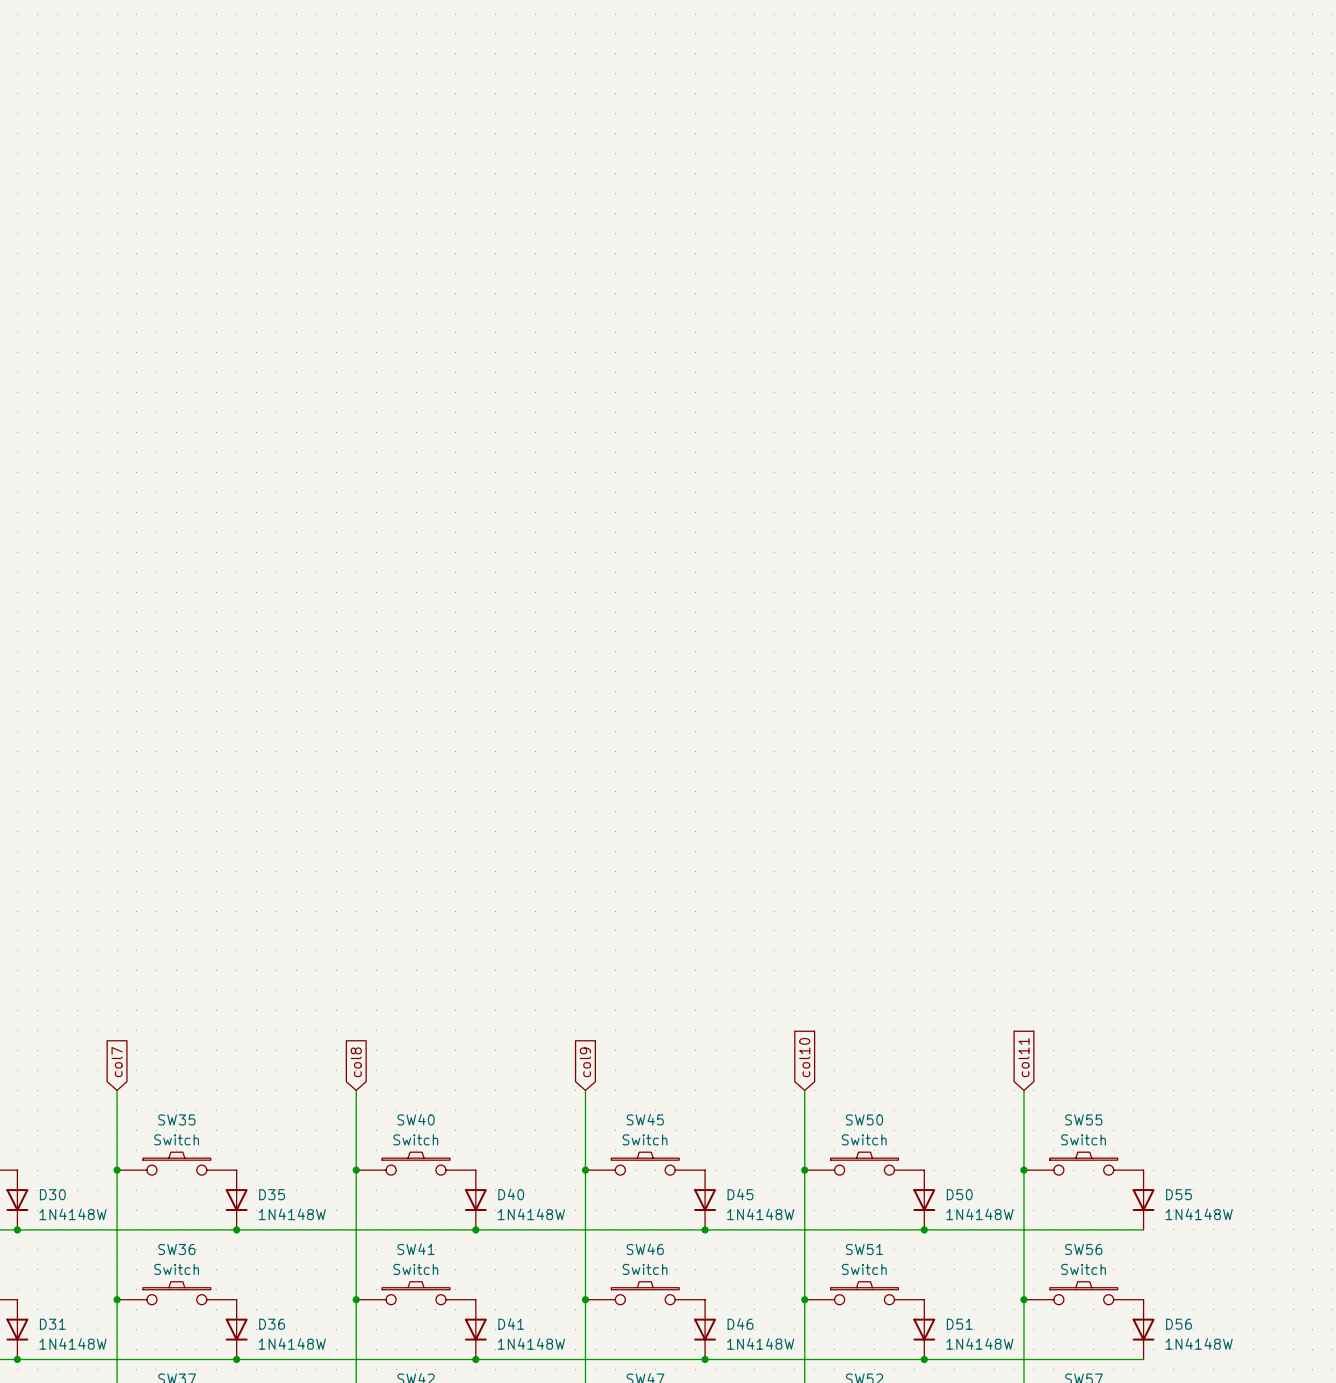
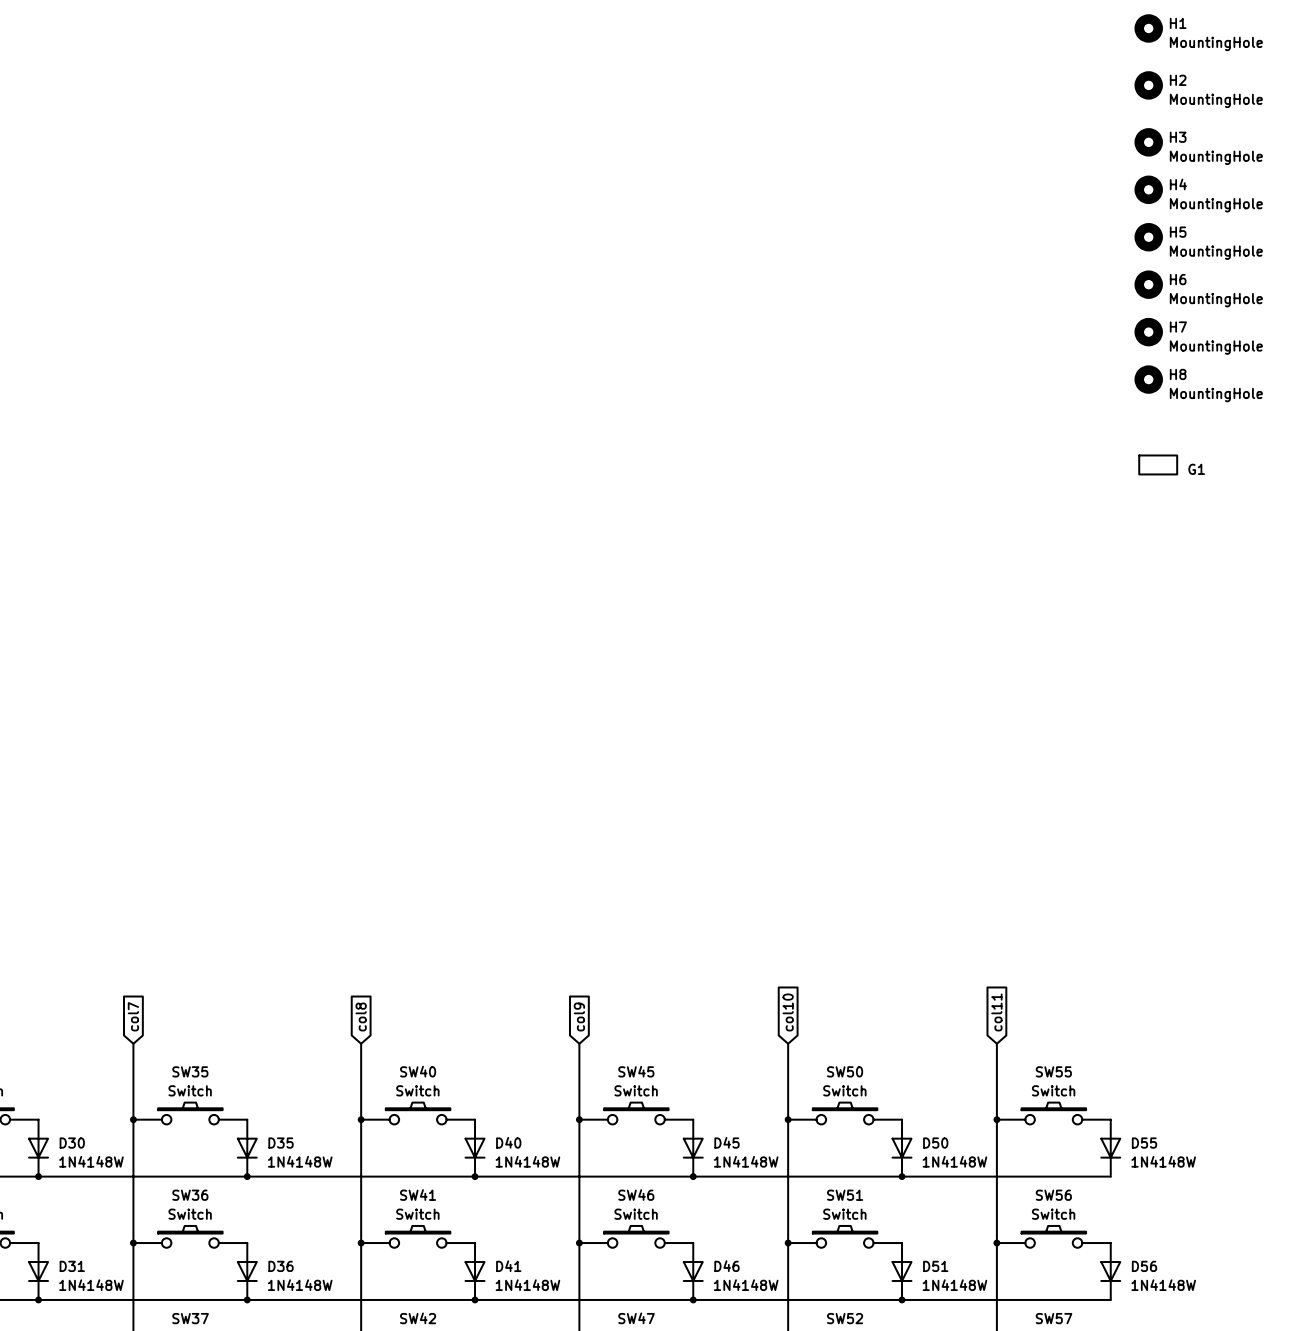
H1: none -> MountingHole (1148, 28)
H2: none -> MountingHole (1148, 85)
H3: none -> MountingHole (1148, 142)
H4: none -> MountingHole (1148, 189)
H5: none -> MountingHole (1148, 237)
H6: none -> MountingHole (1148, 284)
H7: none -> MountingHole (1148, 332)
H8: none -> MountingHole (1148, 379)
G1: none -> (1158, 464)

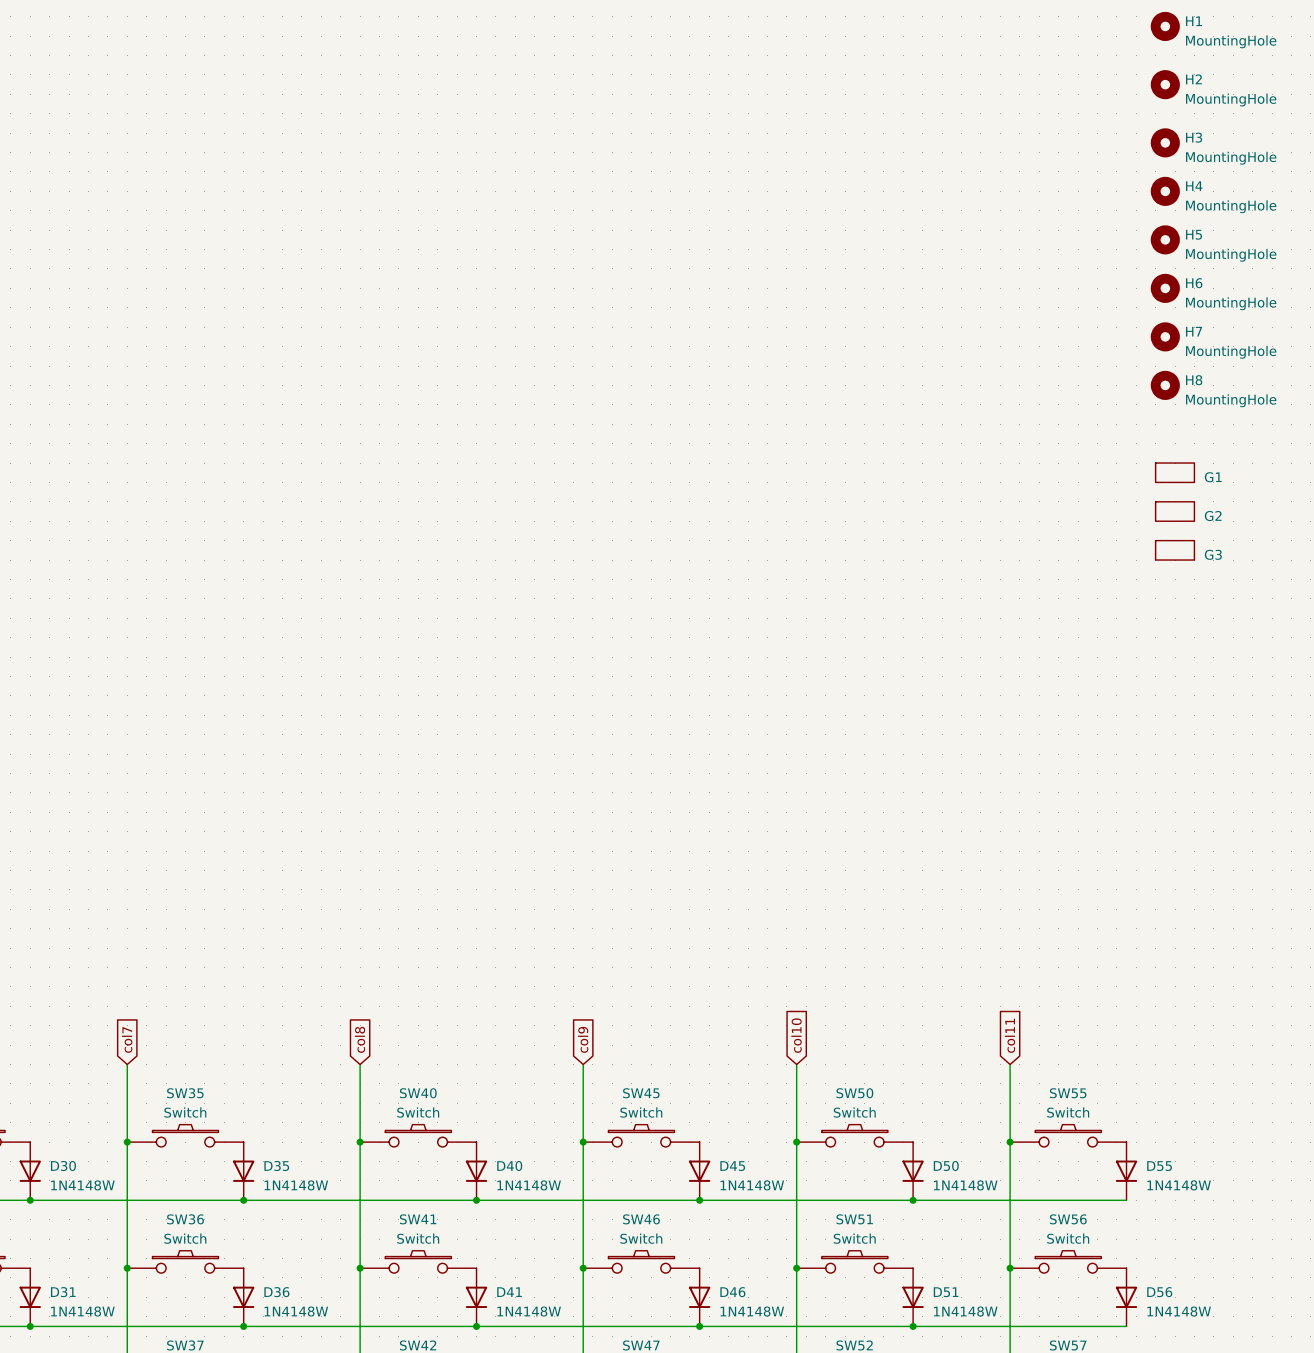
G2: none -> (1175, 511)
G3: none -> (1175, 550)

